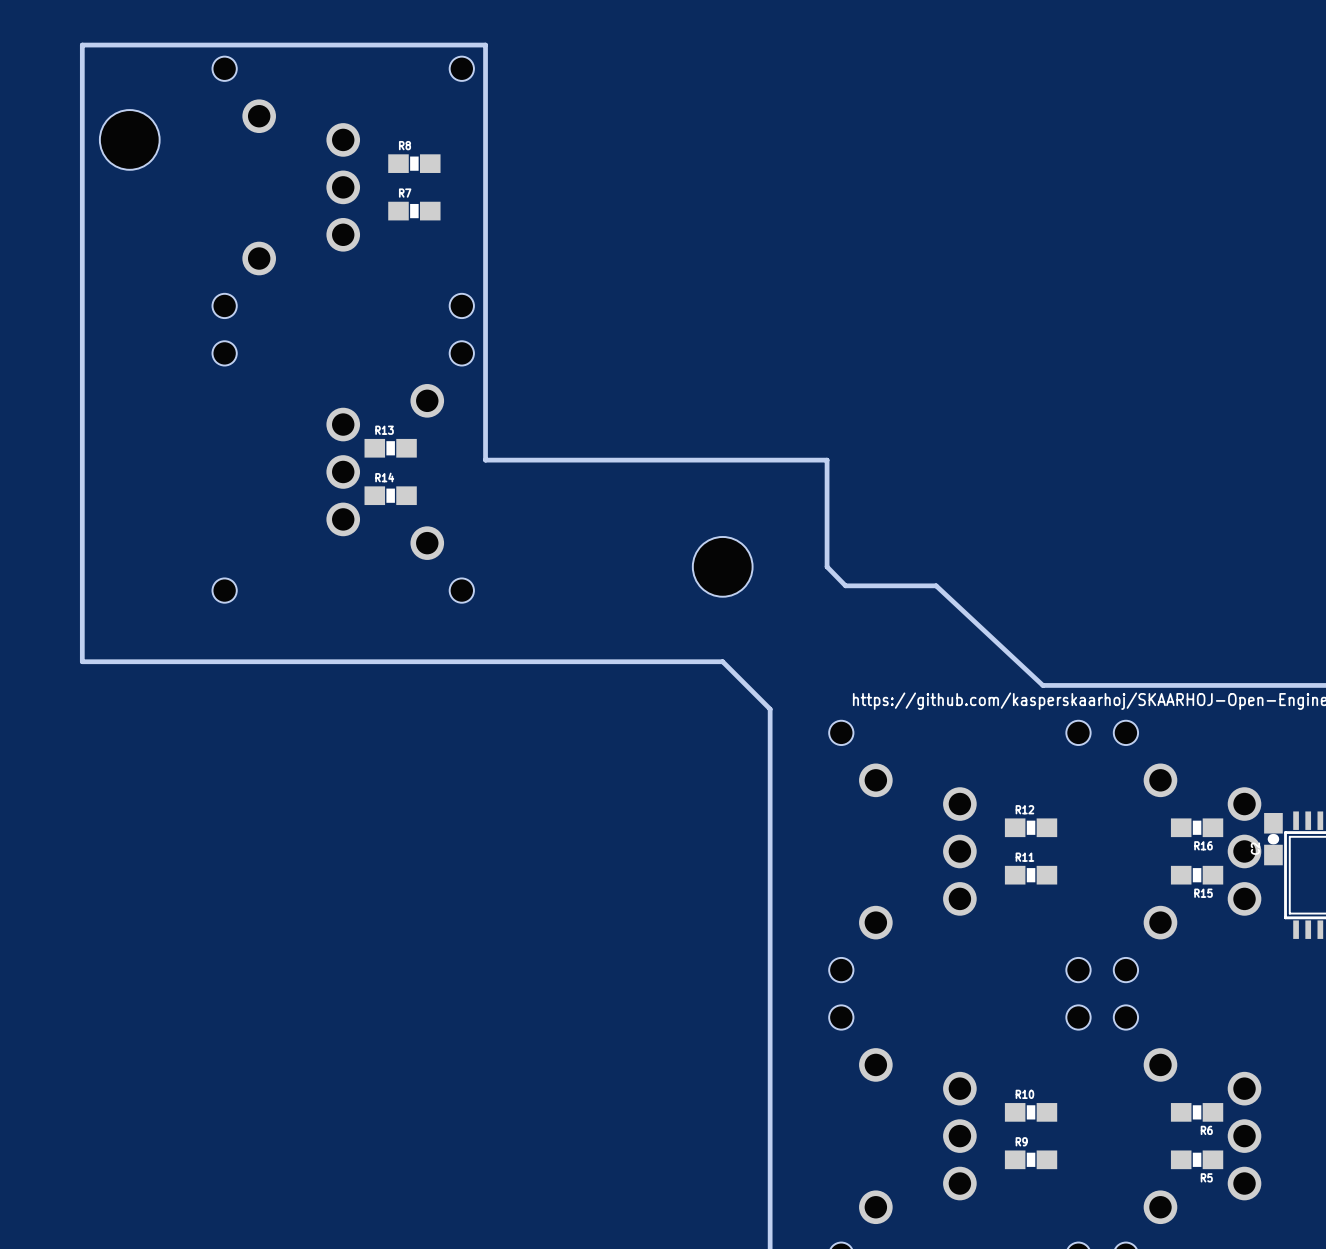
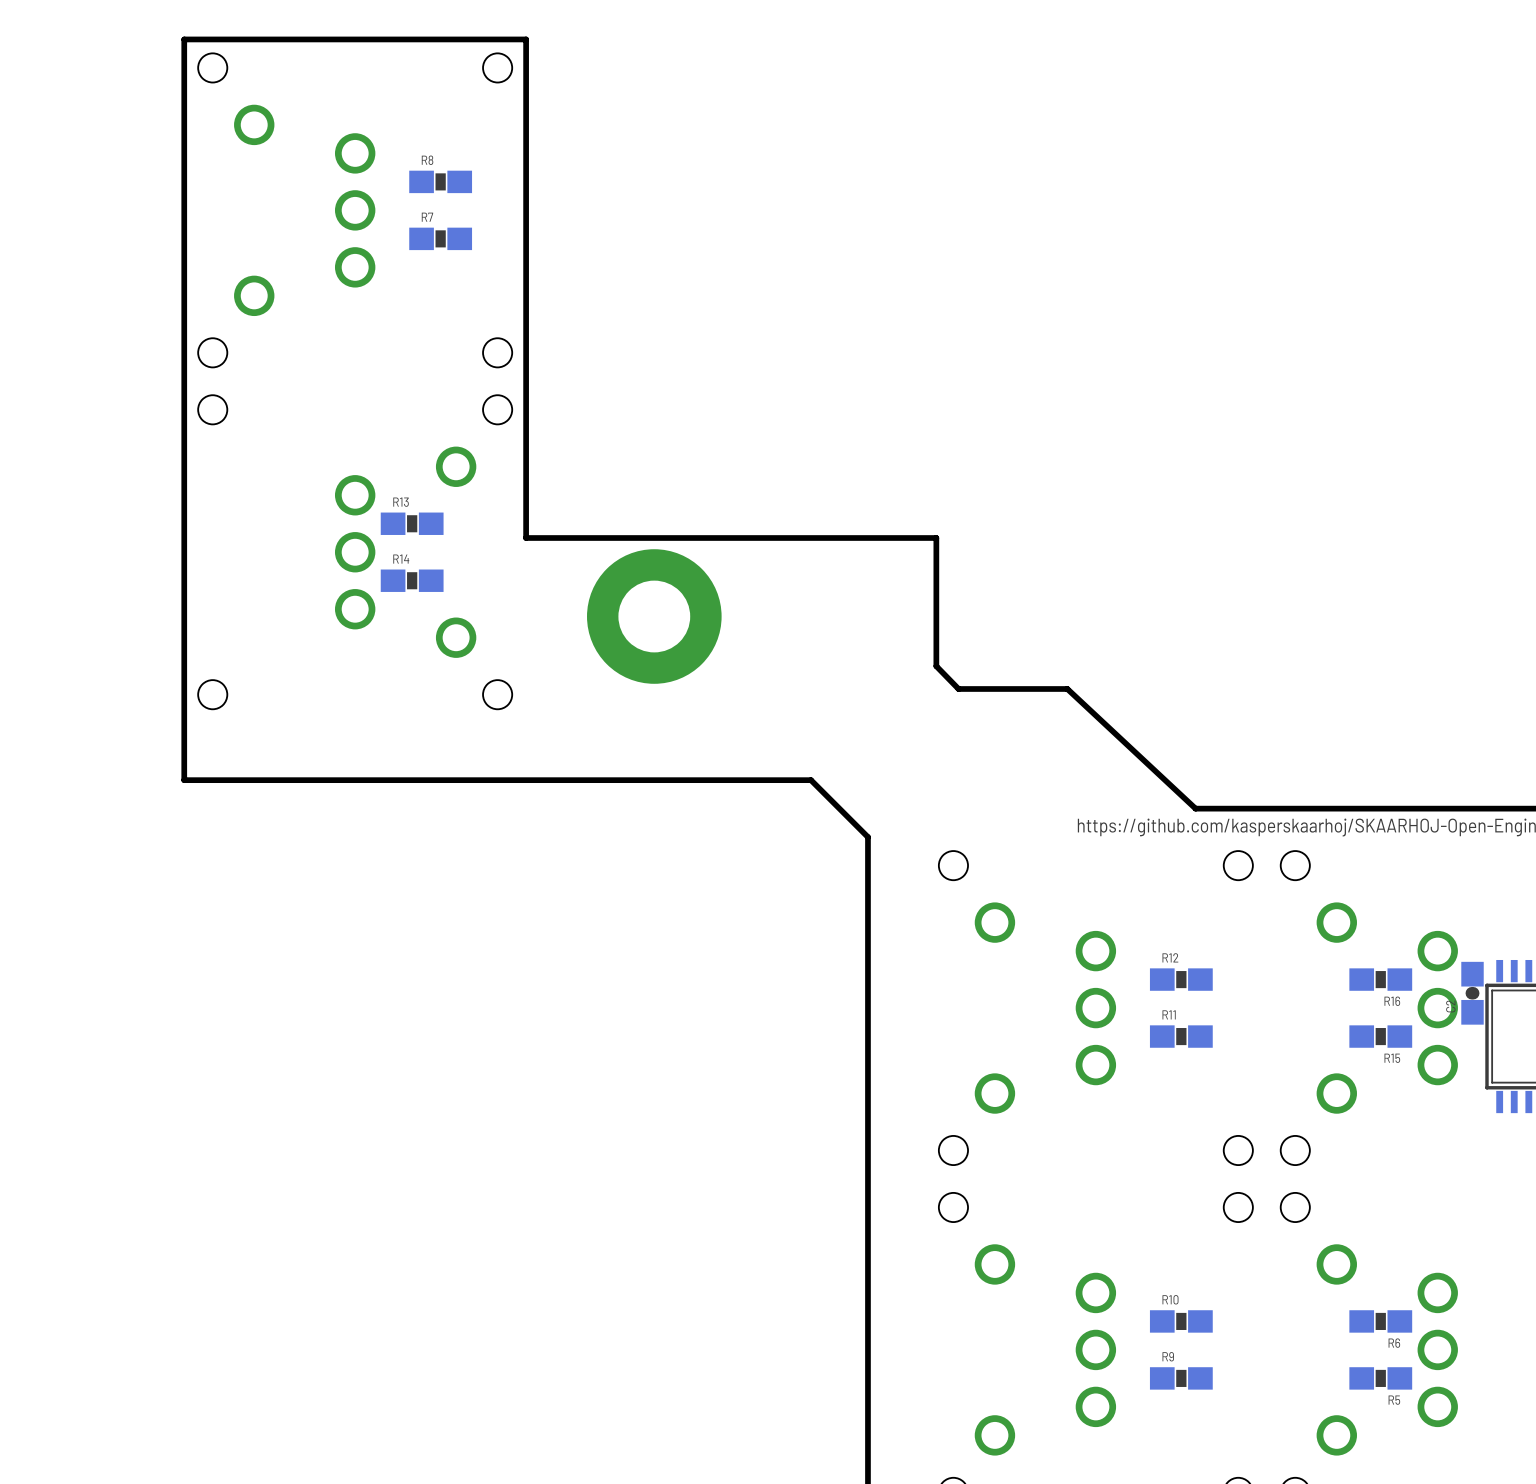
board edge: (200, 45) (82, 45) (82, 661) (200, 661) -> (184, 39) (184, 780)
hole: (129, 139) -> none
part: none -> (654, 616)
hole: (722, 566) -> none

